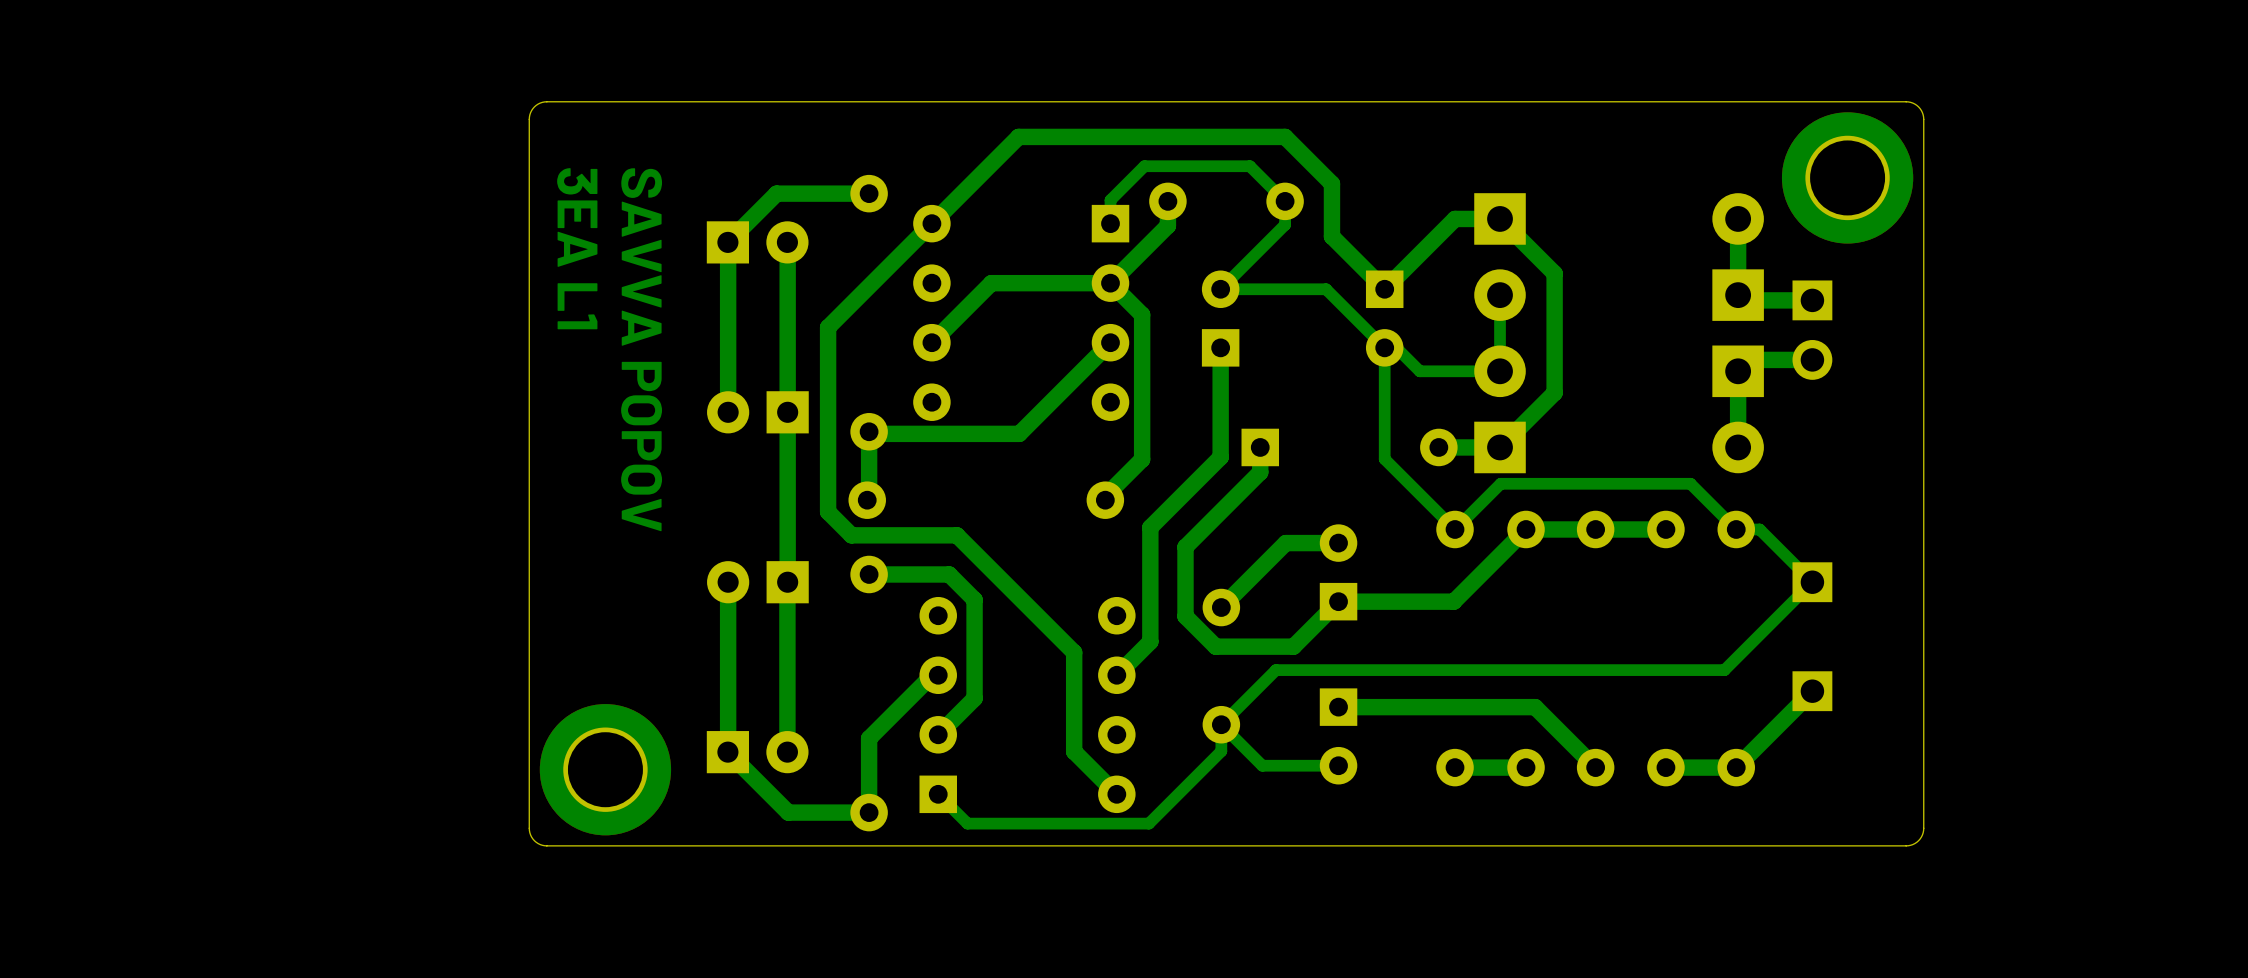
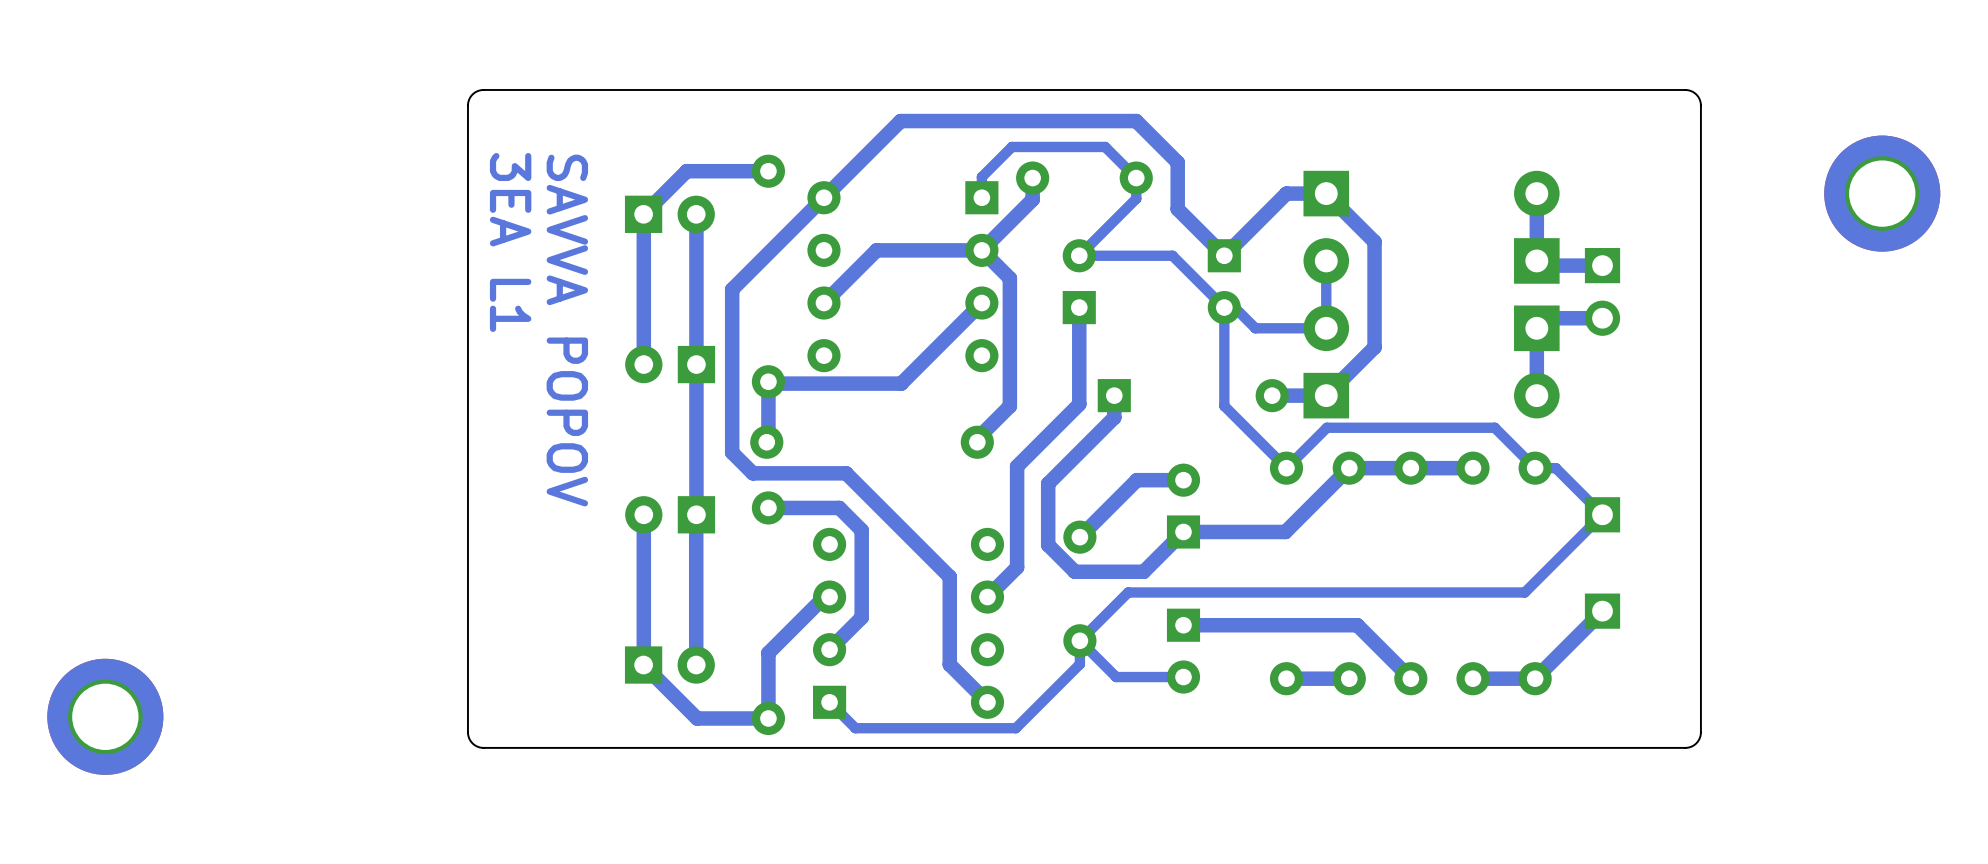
part position: (1847, 177) -> (1882, 193)
part position: (605, 769) -> (105, 716)

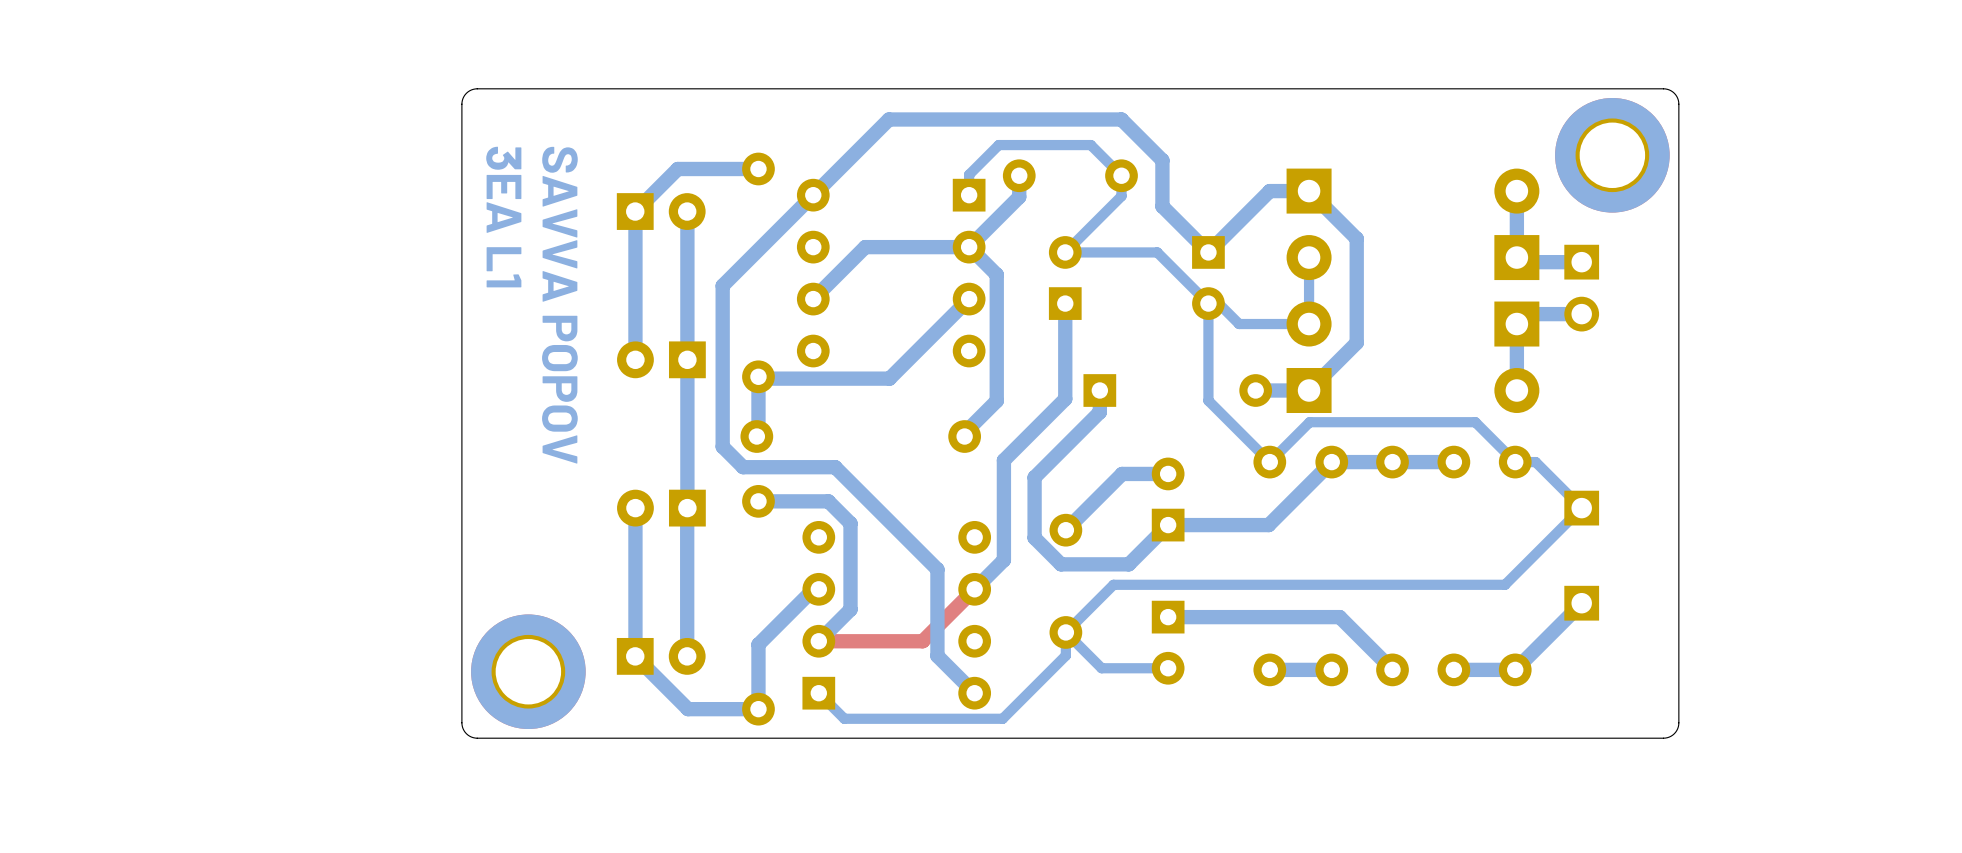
part position: (1882, 193) -> (1612, 155)
top track: none -> (974, 589) (922, 641) (818, 641)
part position: (105, 716) -> (528, 671)

